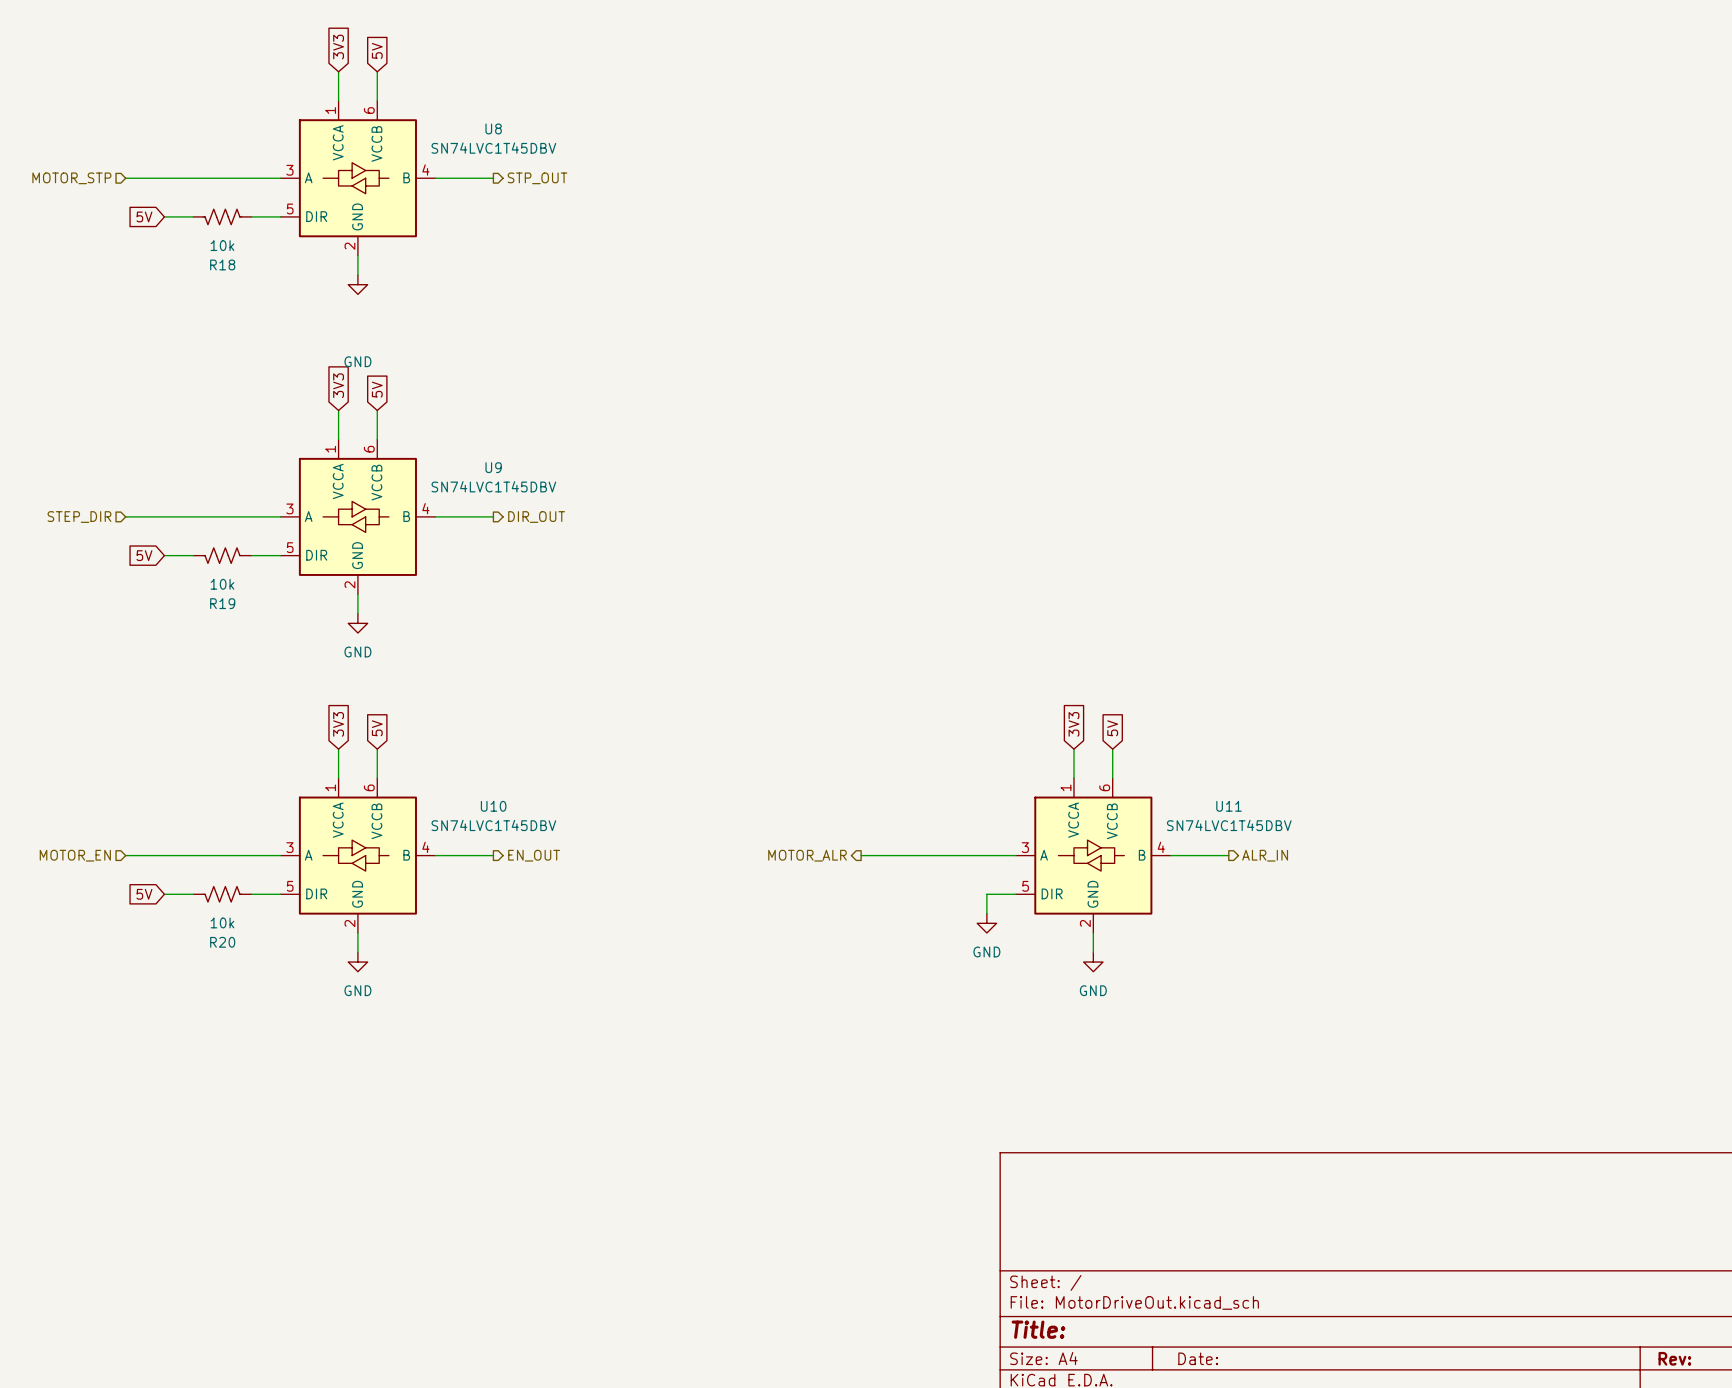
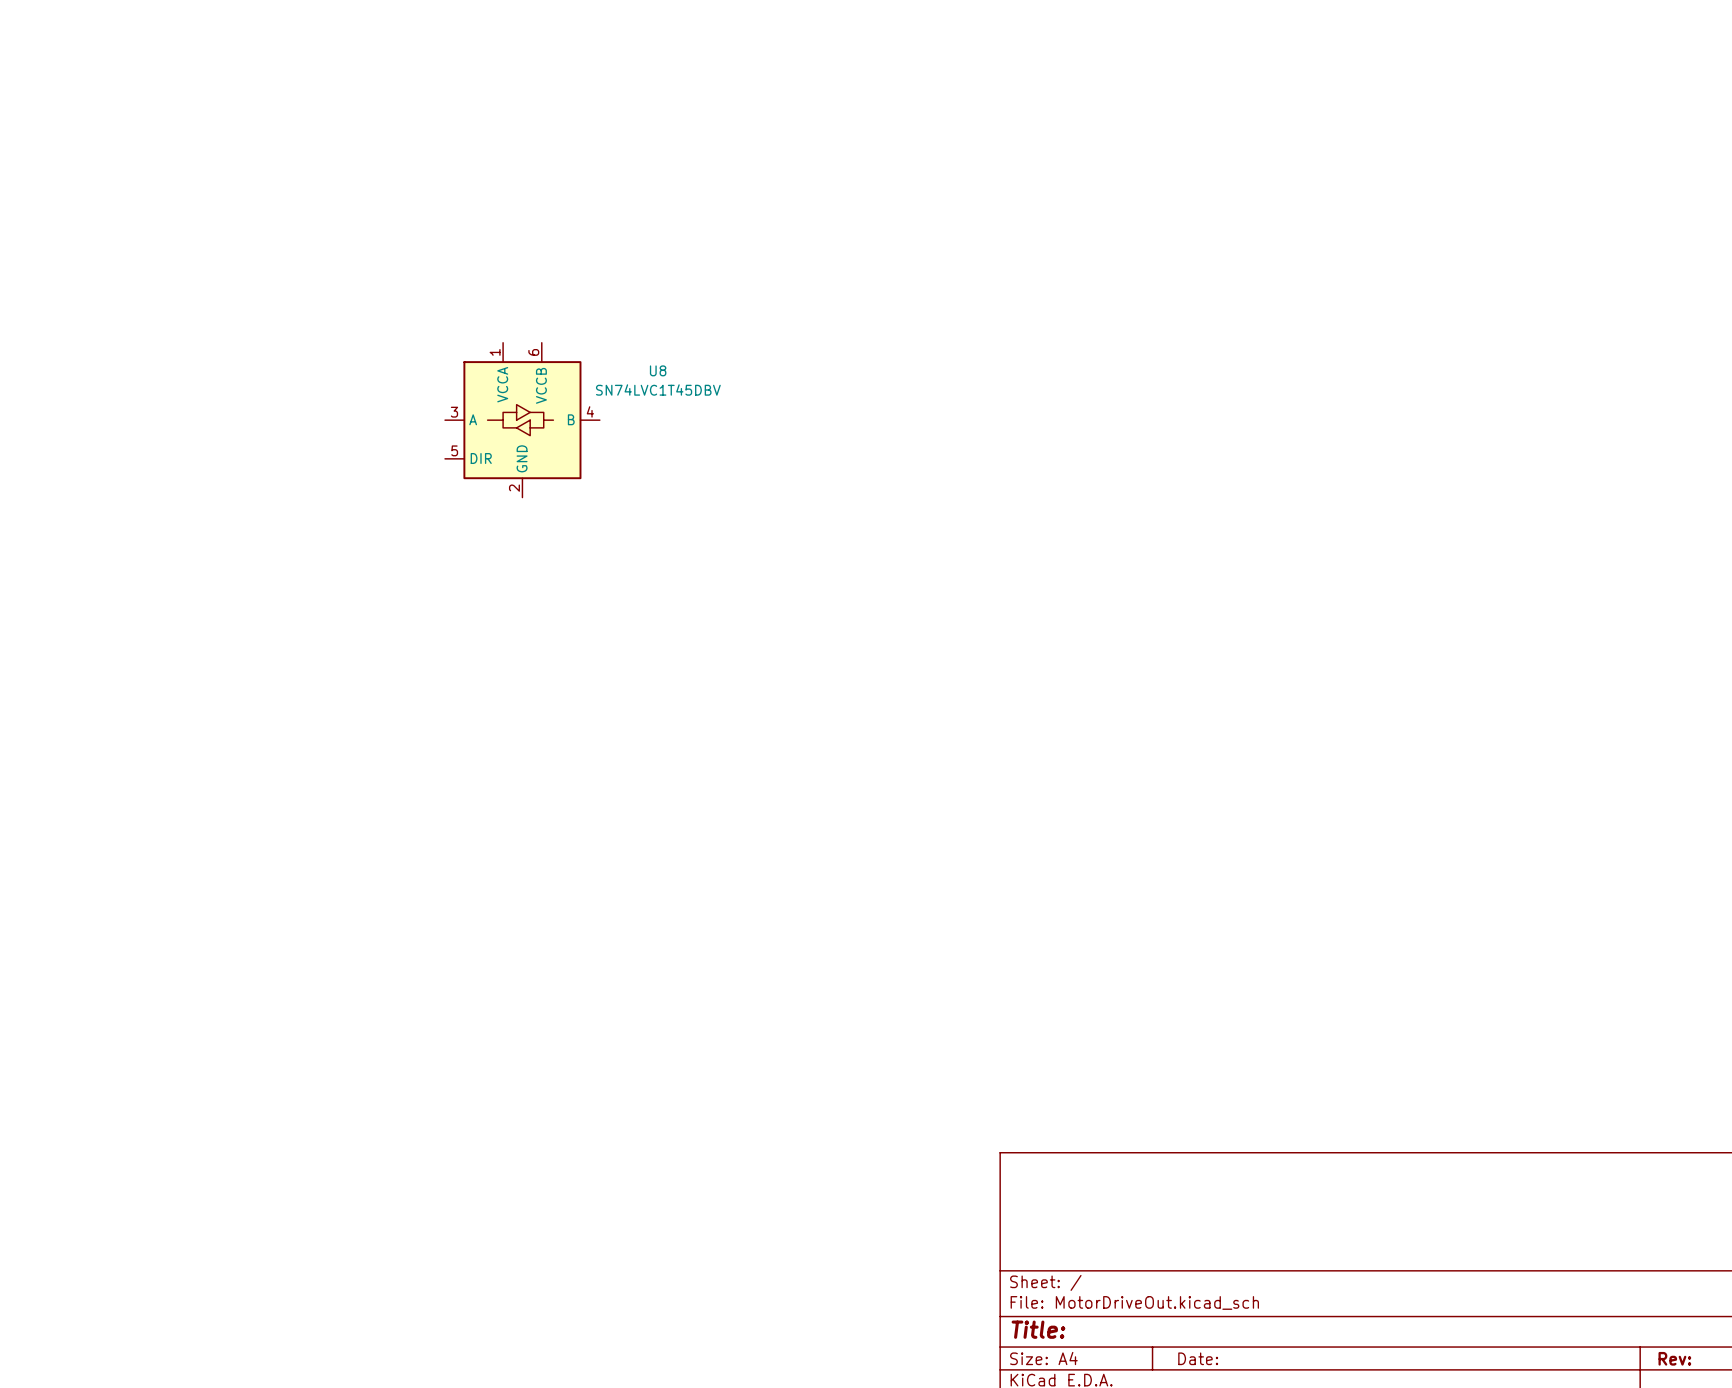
global label: 3V3 (338, 47) -> none
global label: 5V (377, 50) -> none
wire: (338, 71) (338, 100) -> none
wire: (377, 71) (377, 100) -> none
hierarchical label: MOTOR_STP (71, 178) -> none
wire: (125, 178) (280, 178) -> none
U8 position: (357, 178) -> (522, 420)
wire: (435, 178) (493, 178) -> none
hierarchical label: STP_OUT (537, 178) -> none
global label: 5V (144, 216) -> none
wire: (164, 216) (193, 216) -> none
R18: 10k (222, 216) -> none
wire: (251, 216) (280, 216) -> none
wire: (357, 255) (357, 275) -> none
power symbol: GND (357, 284) -> none
global label: 3V3 (338, 385) -> none
global label: 5V (377, 389) -> none
wire: (338, 410) (338, 439) -> none
wire: (377, 410) (377, 439) -> none
wire: (125, 516) (280, 516) -> none
U9: SN74LVC1T45DBV (357, 516) -> none
wire: (435, 516) (493, 516) -> none
hierarchical label: STEP_DIR (79, 517) -> none
hierarchical label: DIR_OUT (536, 517) -> none
global label: 5V (144, 555) -> none
wire: (164, 555) (193, 555) -> none
R19: 10k (222, 555) -> none
wire: (251, 555) (280, 555) -> none
wire: (357, 594) (357, 613) -> none
power symbol: GND (357, 623) -> none
global label: 3V3 (338, 724) -> none
global label: 3V3 (1073, 724) -> none
global label: 5V (377, 728) -> none
global label: 5V (1112, 728) -> none
wire: (338, 749) (338, 778) -> none
wire: (377, 749) (377, 778) -> none
wire: (1073, 749) (1073, 778) -> none
wire: (1112, 749) (1112, 778) -> none
hierarchical label: MOTOR_EN (75, 855) -> none
wire: (125, 855) (280, 855) -> none
U10: SN74LVC1T45DBV (357, 855) -> none
wire: (435, 855) (493, 855) -> none
hierarchical label: EN_OUT (534, 855) -> none
hierarchical label: MOTOR_ALR (807, 855) -> none
wire: (861, 855) (1015, 855) -> none
U11: SN74LVC1T45DBV (1093, 855) -> none
wire: (1170, 855) (1228, 855) -> none
hierarchical label: ALR_IN (1265, 855) -> none
global label: 5V (144, 894) -> none
wire: (164, 894) (193, 894) -> none
R20: 10k (222, 894) -> none
wire: (251, 894) (280, 894) -> none
wire: (1015, 894) (986, 894) (986, 913) -> none
power symbol: GND (986, 923) -> none
wire: (357, 933) (357, 952) -> none
wire: (1093, 933) (1093, 952) -> none
power symbol: GND (357, 962) -> none
power symbol: GND (1093, 962) -> none

